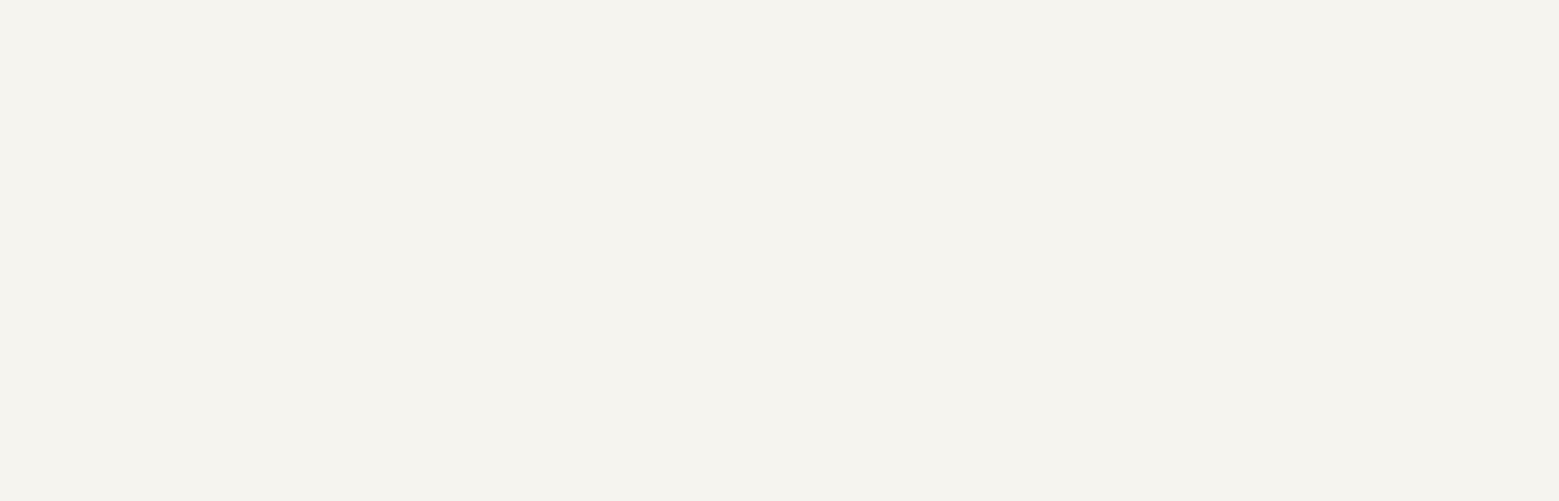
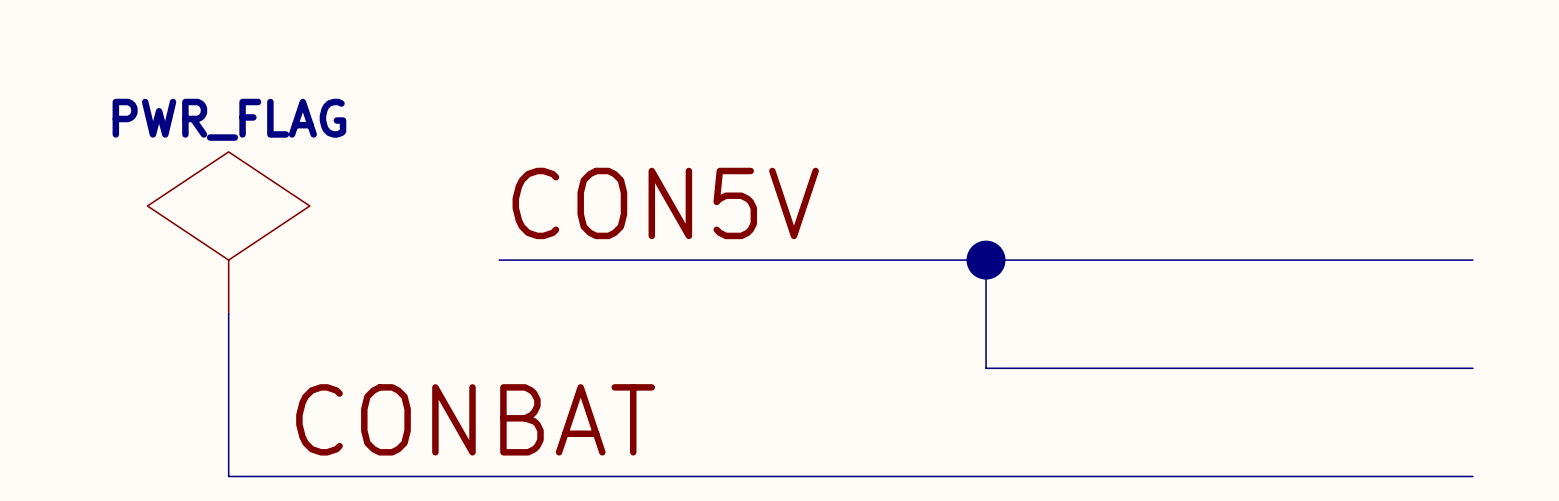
label: none -> CON5V (665, 203)
power symbol: none -> PWR_FLAG (228, 233)
wire: none -> (499, 260) (1472, 260)
wire: none -> (986, 260) (986, 368) (1472, 368)
junction: none -> (986, 260)
wire: none -> (228, 314) (228, 476) (1472, 476)
label: none -> CONBAT (475, 419)

